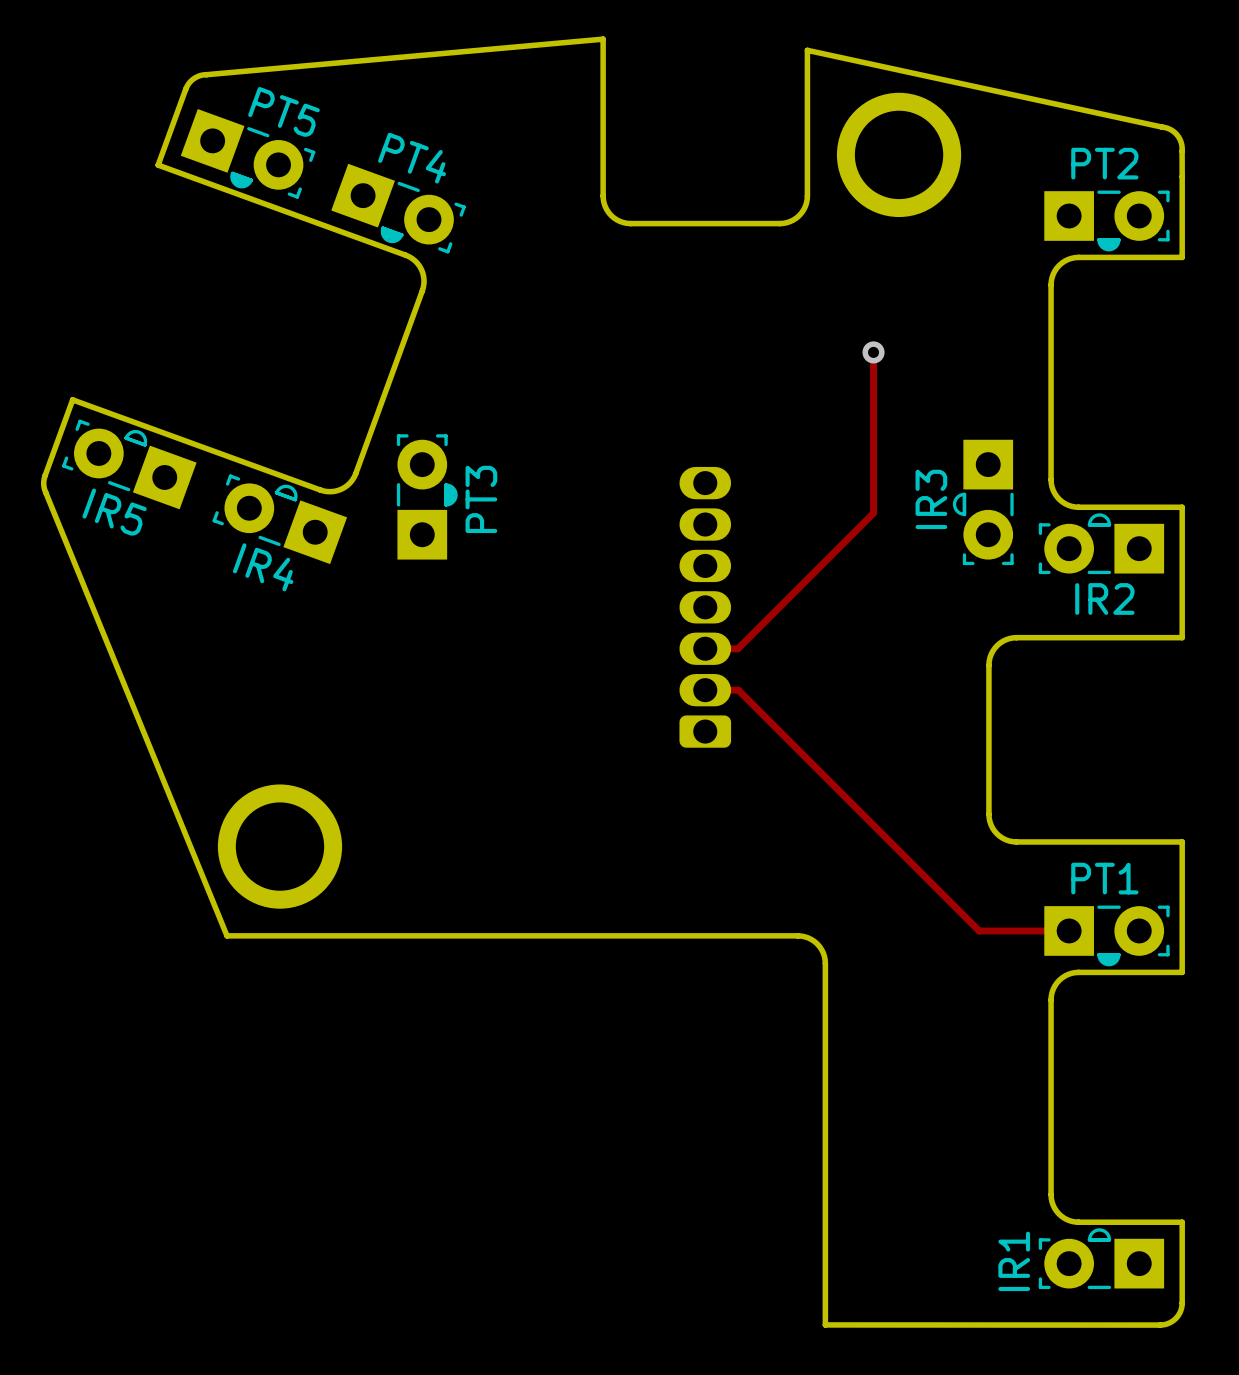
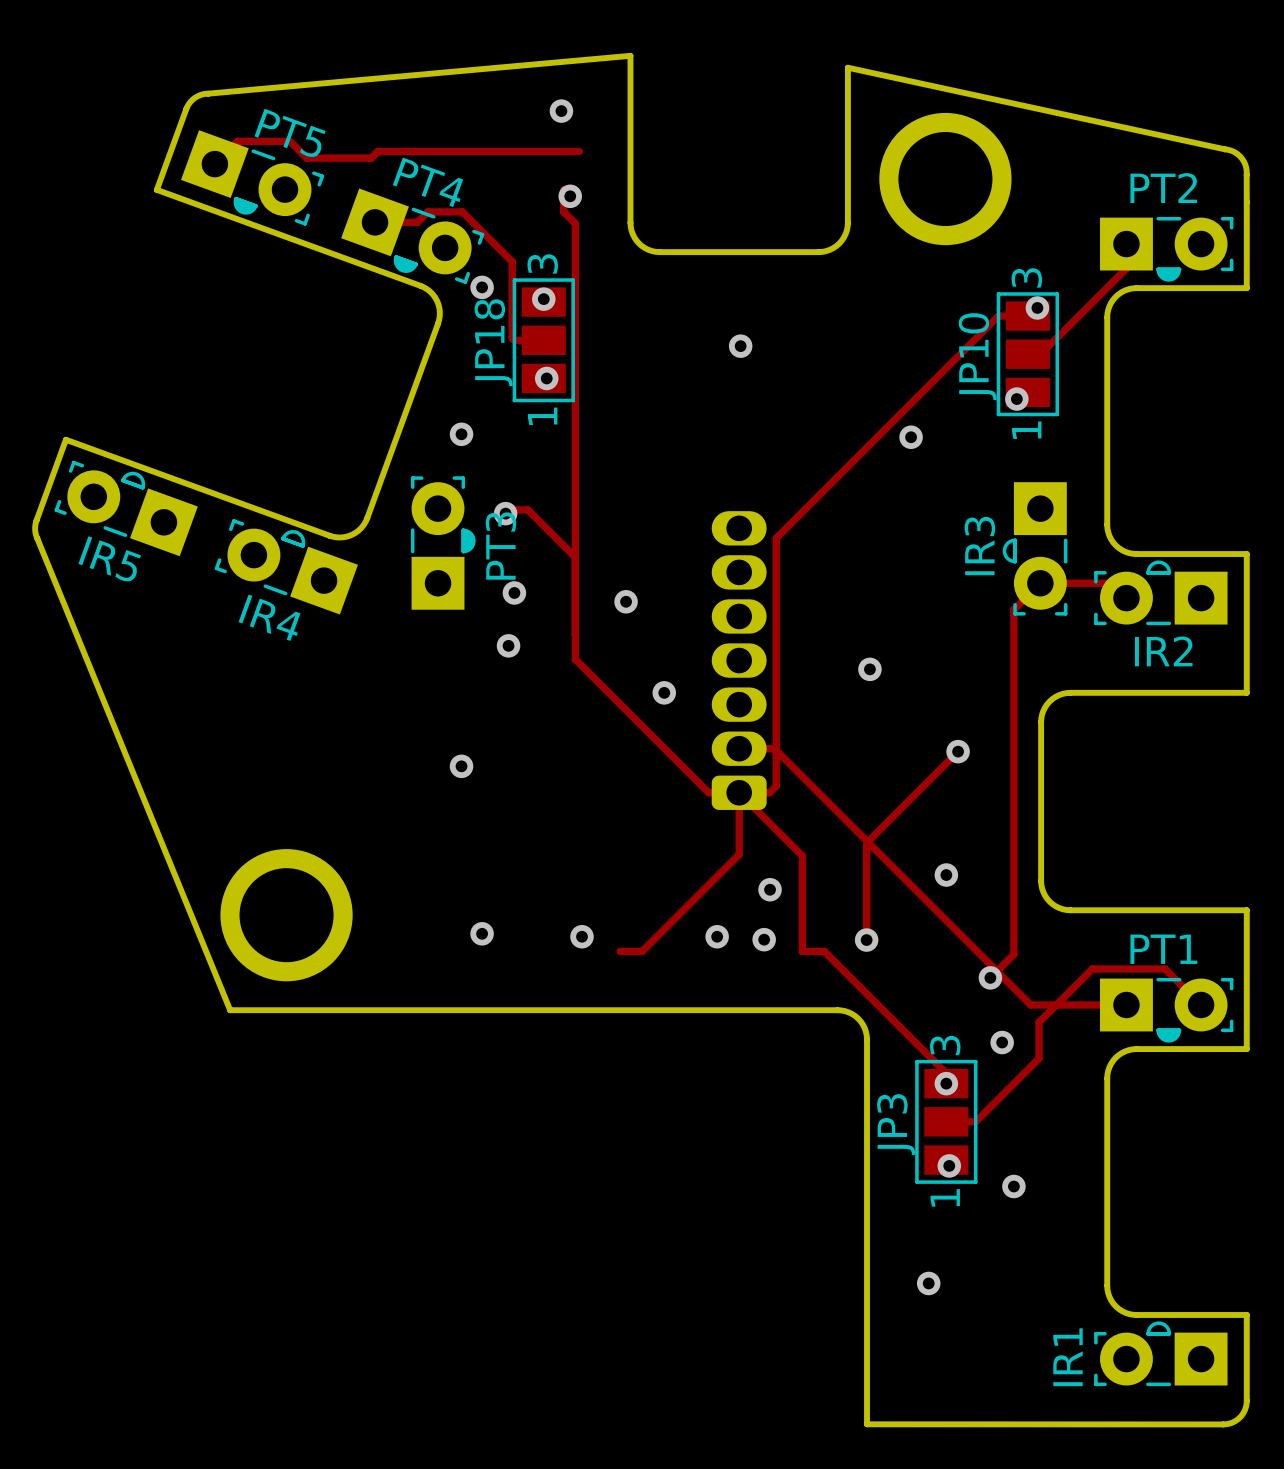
via: none -> (561, 111)
track: none -> (579, 151) (378, 151) (371, 158) (306, 158) (290, 141) (237, 141) (214, 164)
track: none -> (563, 189) (563, 211) (575, 223) (575, 659) (708, 792) (769, 792) (776, 786) (776, 538) (998, 316) (1027, 316)
via: none -> (570, 196)
track: none -> (375, 222) (417, 222) (427, 211) (462, 211) (512, 261) (512, 338) (514, 340) (543, 340)
track: none -> (1126, 244) (1126, 268) (1040, 354) (1027, 354)
via: none -> (482, 287)
via: none -> (543, 299)
via: none -> (1037, 307)
JP18: none -> (543, 340)
via: none -> (740, 346)
JP10: none -> (1027, 354)
via: none -> (546, 378)
track: (873, 352) (873, 513) (737, 648) (705, 648) -> none
via position: (873, 352) -> (911, 437)
via: none -> (1016, 399)
via: none -> (461, 434)
track: none -> (512, 509) (527, 509) (575, 557)
via: none -> (505, 513)
via: none -> (514, 592)
track: none -> (1126, 598) (1111, 583) (1040, 583) (1013, 609) (1013, 954) (990, 977)
via: none -> (626, 601)
via: none -> (508, 645)
via: none -> (869, 669)
via: none -> (664, 692)
track: none -> (958, 751) (866, 843) (866, 940)
via: none -> (958, 751)
via: none -> (461, 766)
via: none -> (946, 875)
via: none -> (770, 889)
via: none -> (482, 933)
via: none -> (581, 936)
via: none -> (717, 936)
via: none -> (764, 939)
via: none -> (866, 940)
track: none -> (620, 951) (642, 951) (739, 854) (739, 792) (802, 855) (802, 951) (824, 951) (946, 1073) (946, 1083)
via: none -> (990, 977)
track: none -> (1201, 1005) (1165, 969) (1092, 969) (1039, 1022) (1039, 1058) (975, 1121) (946, 1121)
via: none -> (1002, 1042)
via: none -> (946, 1083)
JP3: none -> (946, 1121)
via: none -> (949, 1165)
via: none -> (1013, 1186)
via: none -> (928, 1283)

